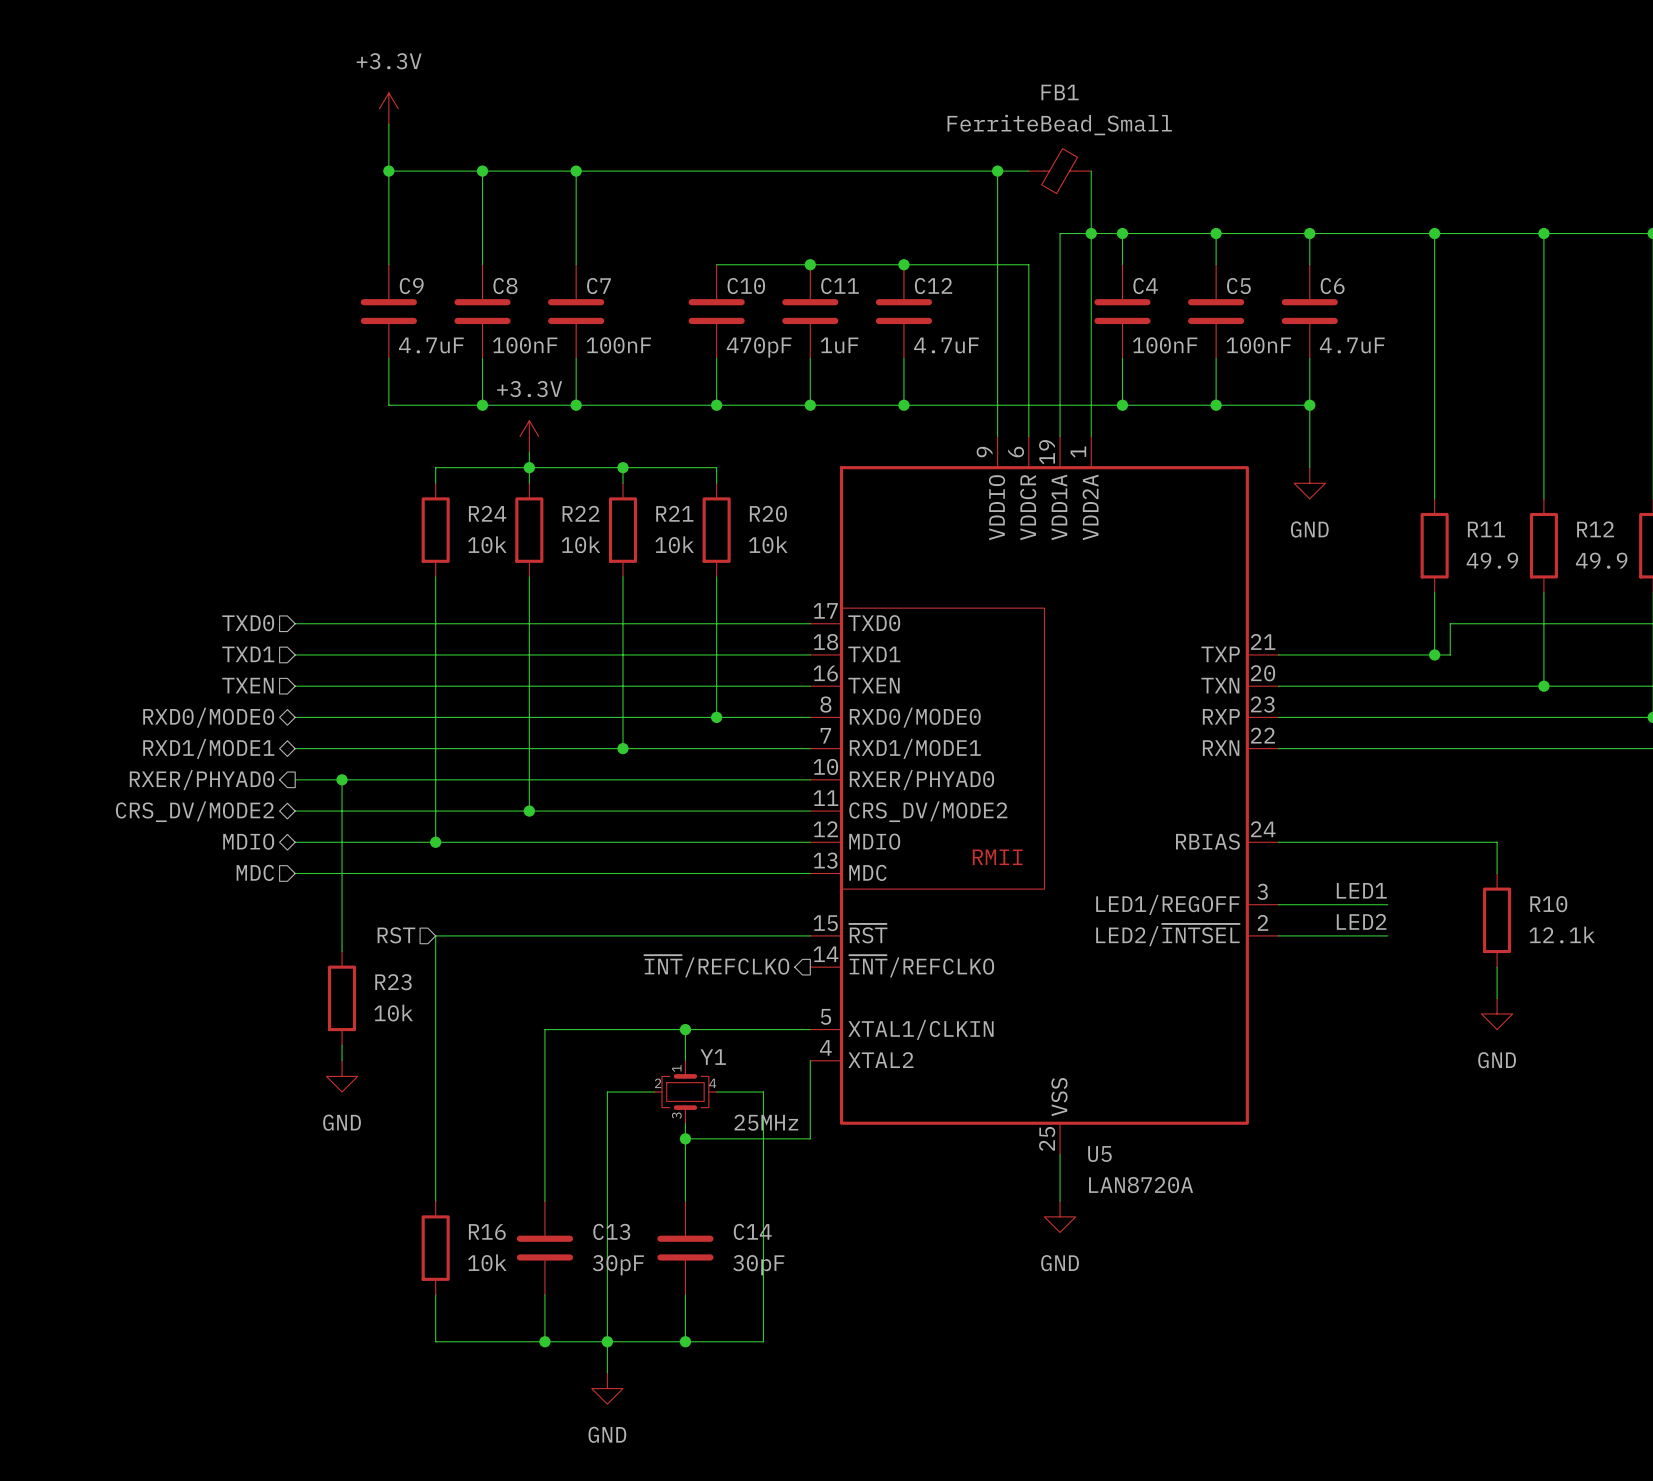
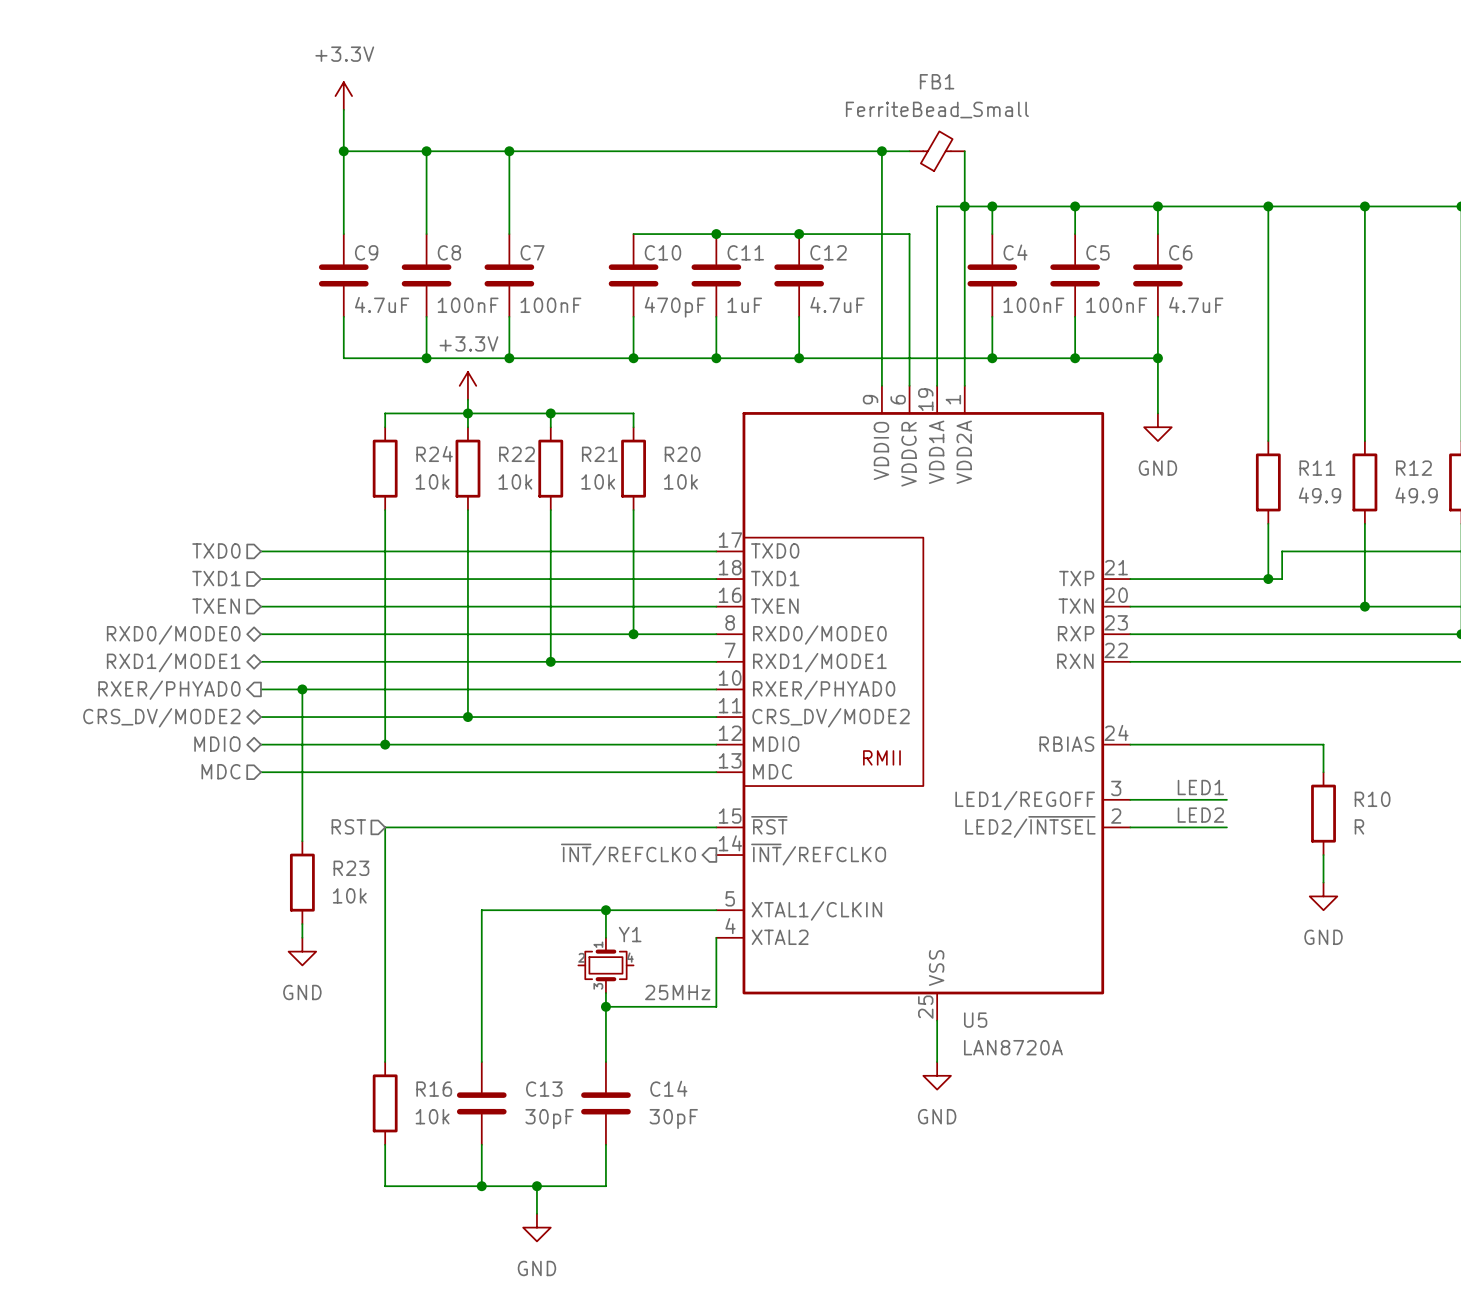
R10 value: 12.1k (1562, 934) -> R (1359, 826)
wire: (654, 1092) (607, 1092) (607, 1341) -> none
wire: (716, 1092) (763, 1092) (763, 1341) (685, 1341) -> none
junction: (685, 1341) -> none

